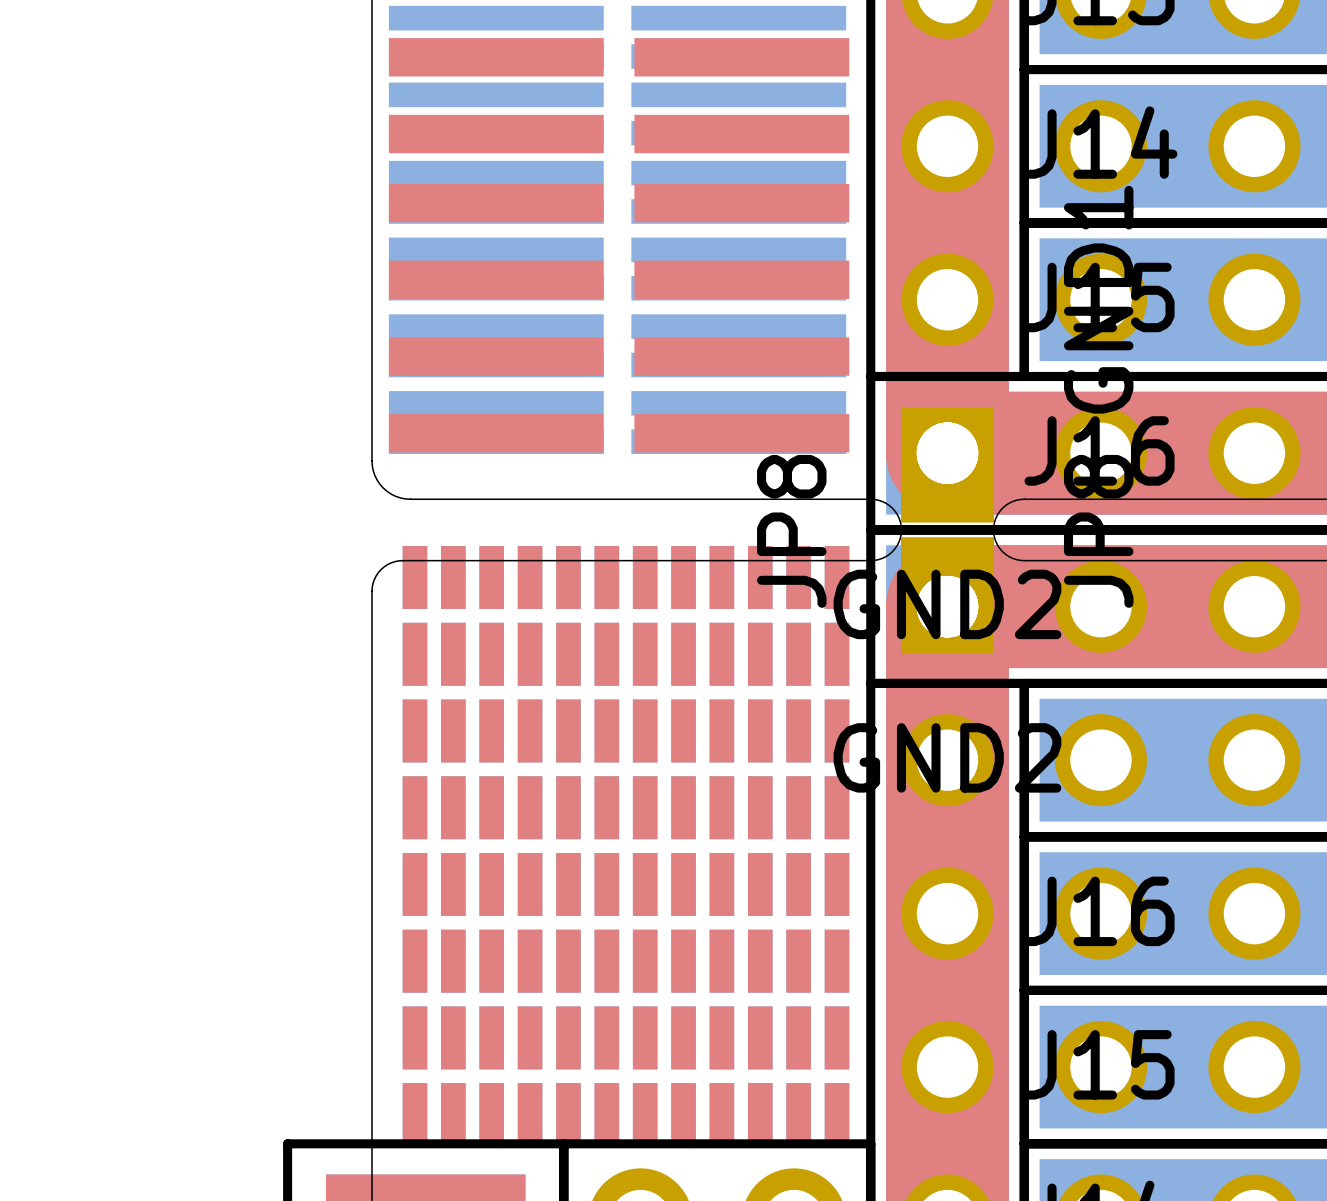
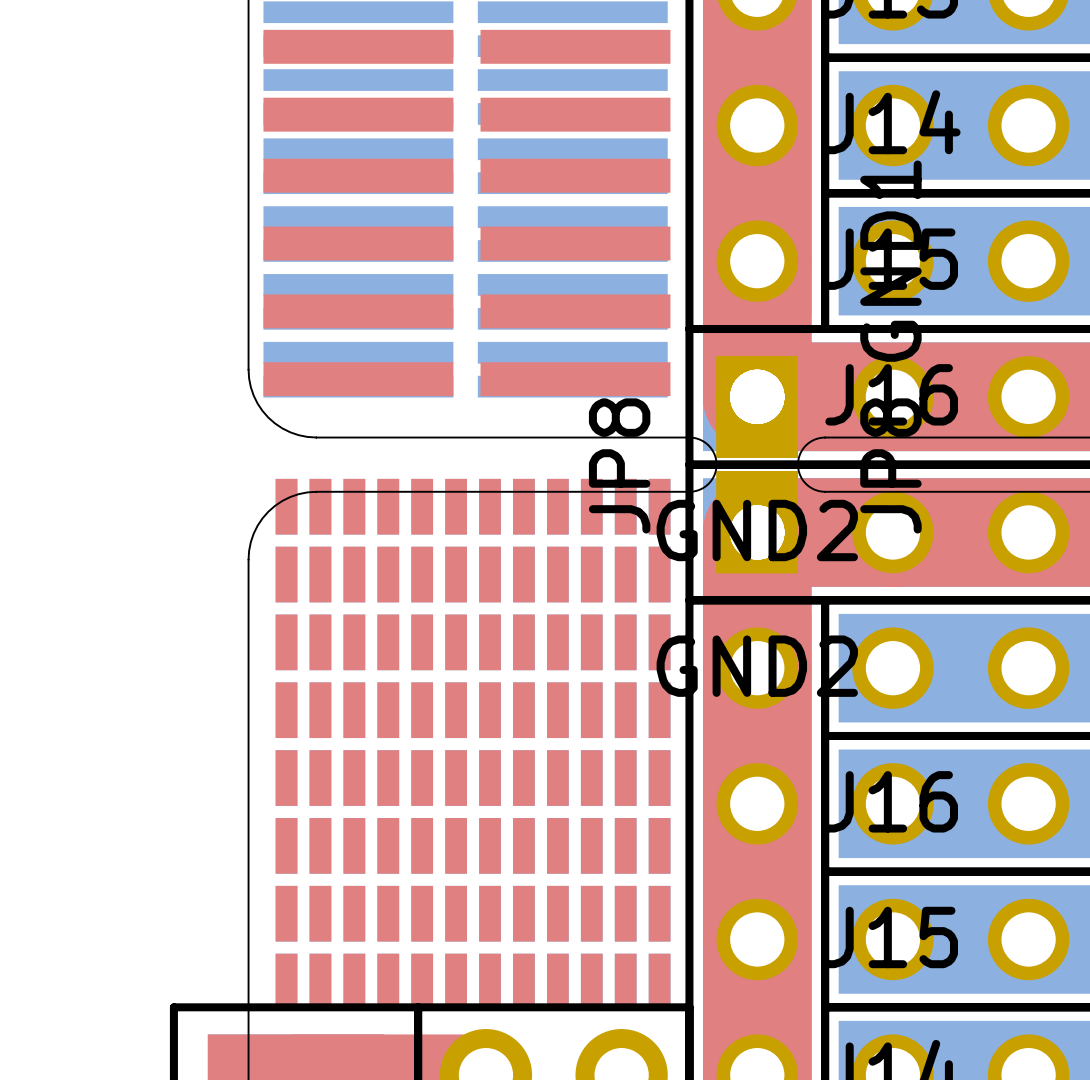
board edge: (372, 422) (372, 465) (374, 475) (383, 488) (395, 496) (405, 498) (448, 499) -> (248, 369) (253, 395) (268, 417) (290, 432) (316, 437)
board edge: (448, 560) (398, 560) (387, 564) (380, 569) (376, 575) (372, 587) (372, 637) -> (316, 491) (290, 496) (268, 511) (253, 533) (248, 559)

